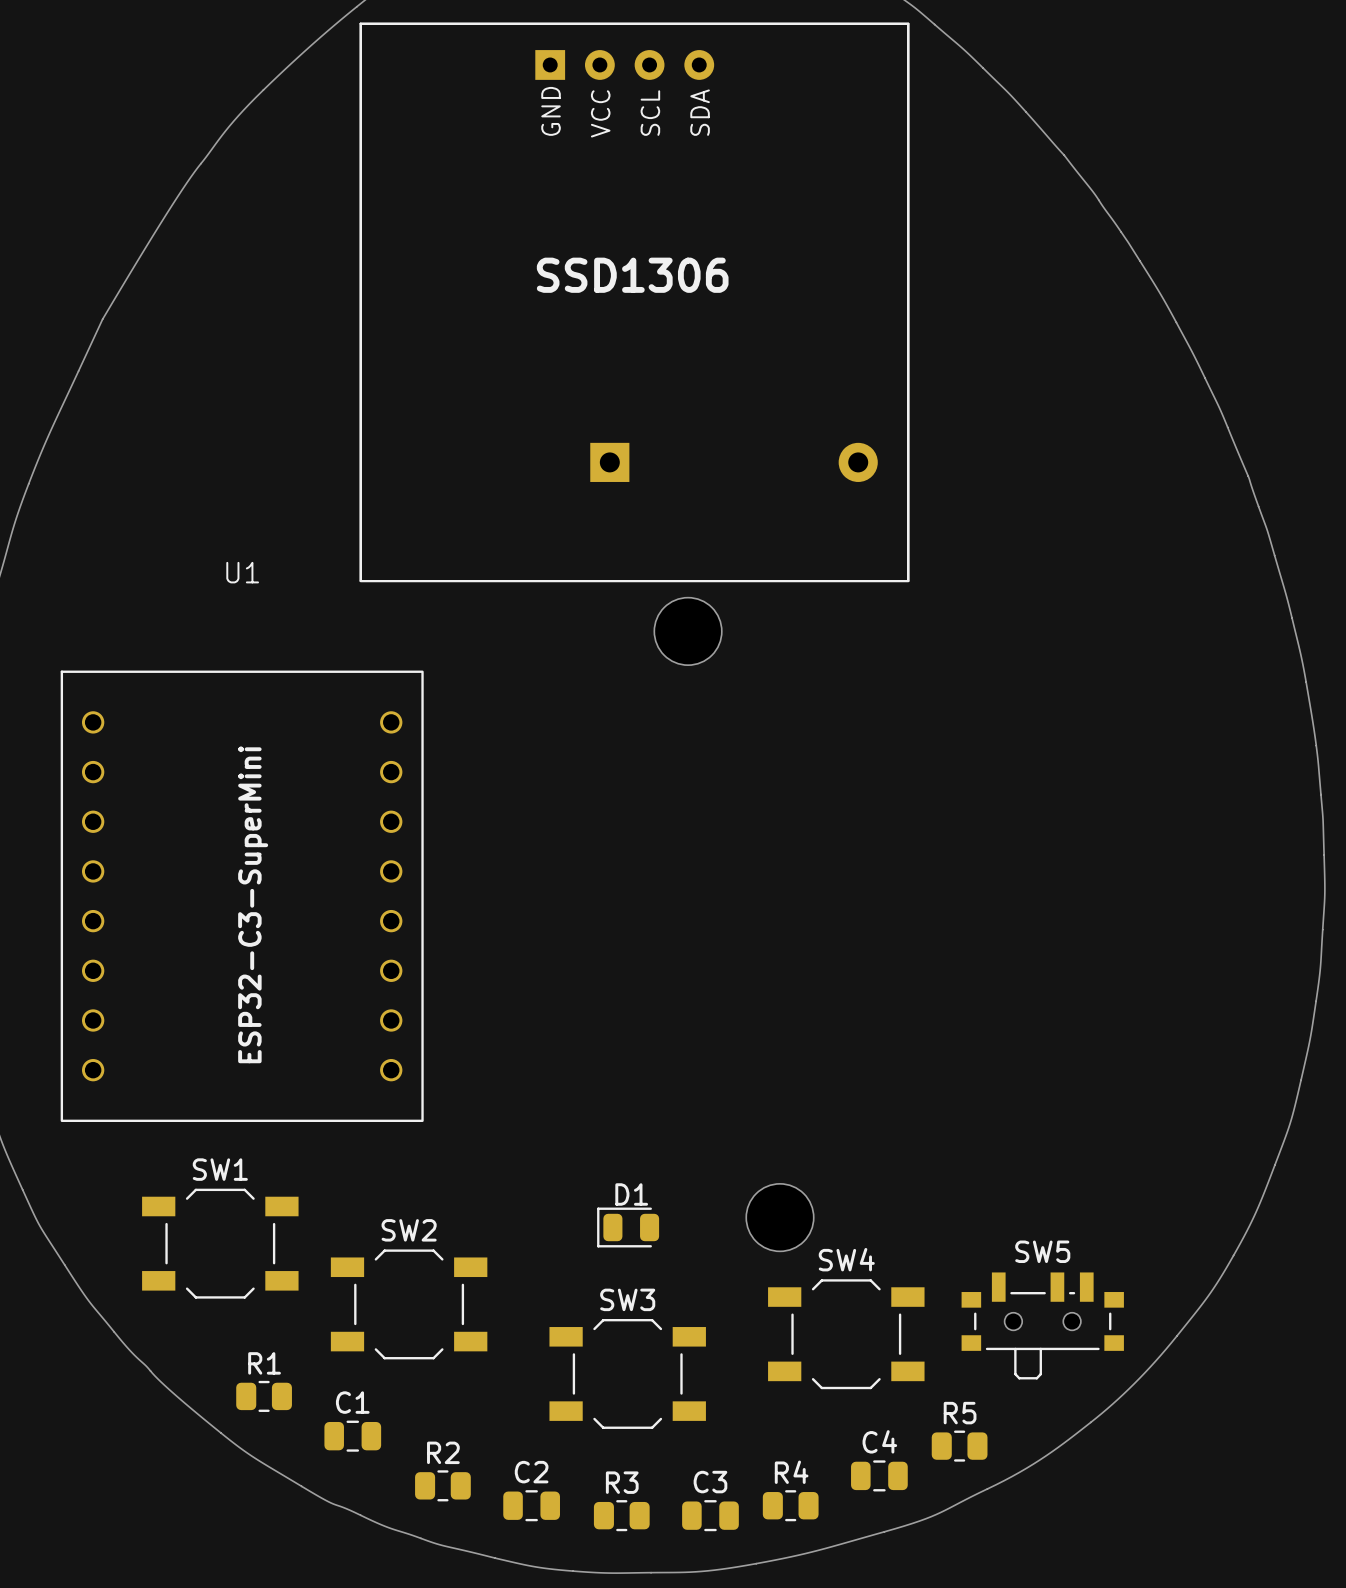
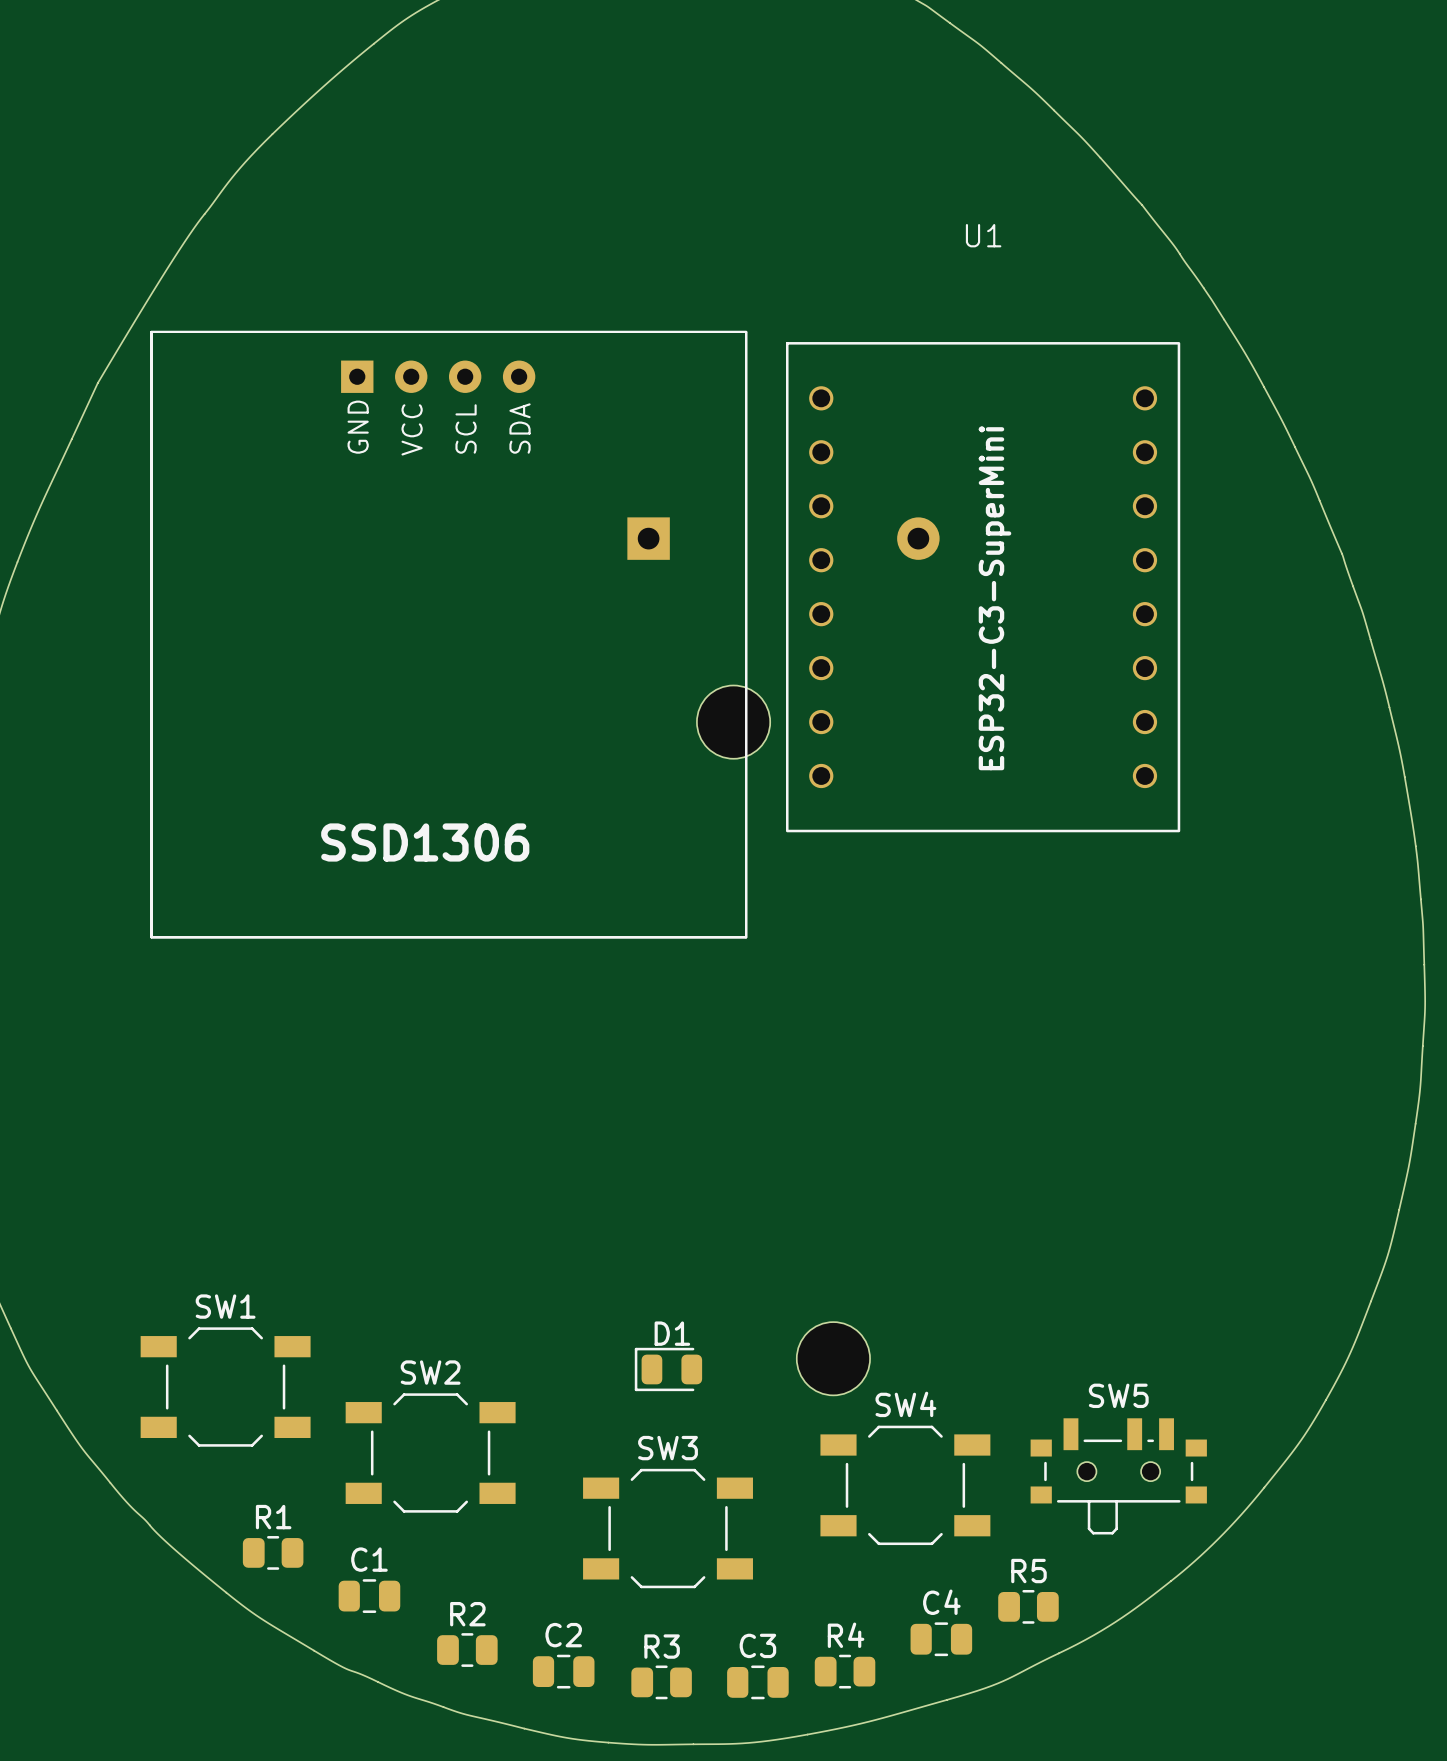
text: SSD1306 (632, 275) -> none
part position: (634, 302) -> (448, 634)
text: none -> ESP32-C3-SuperMini (995, 598)
text: none -> SSD1306 (425, 842)
U1 position: (242, 896) -> (983, 587)
text: ESP32-C3-SuperMini (253, 904) -> none

